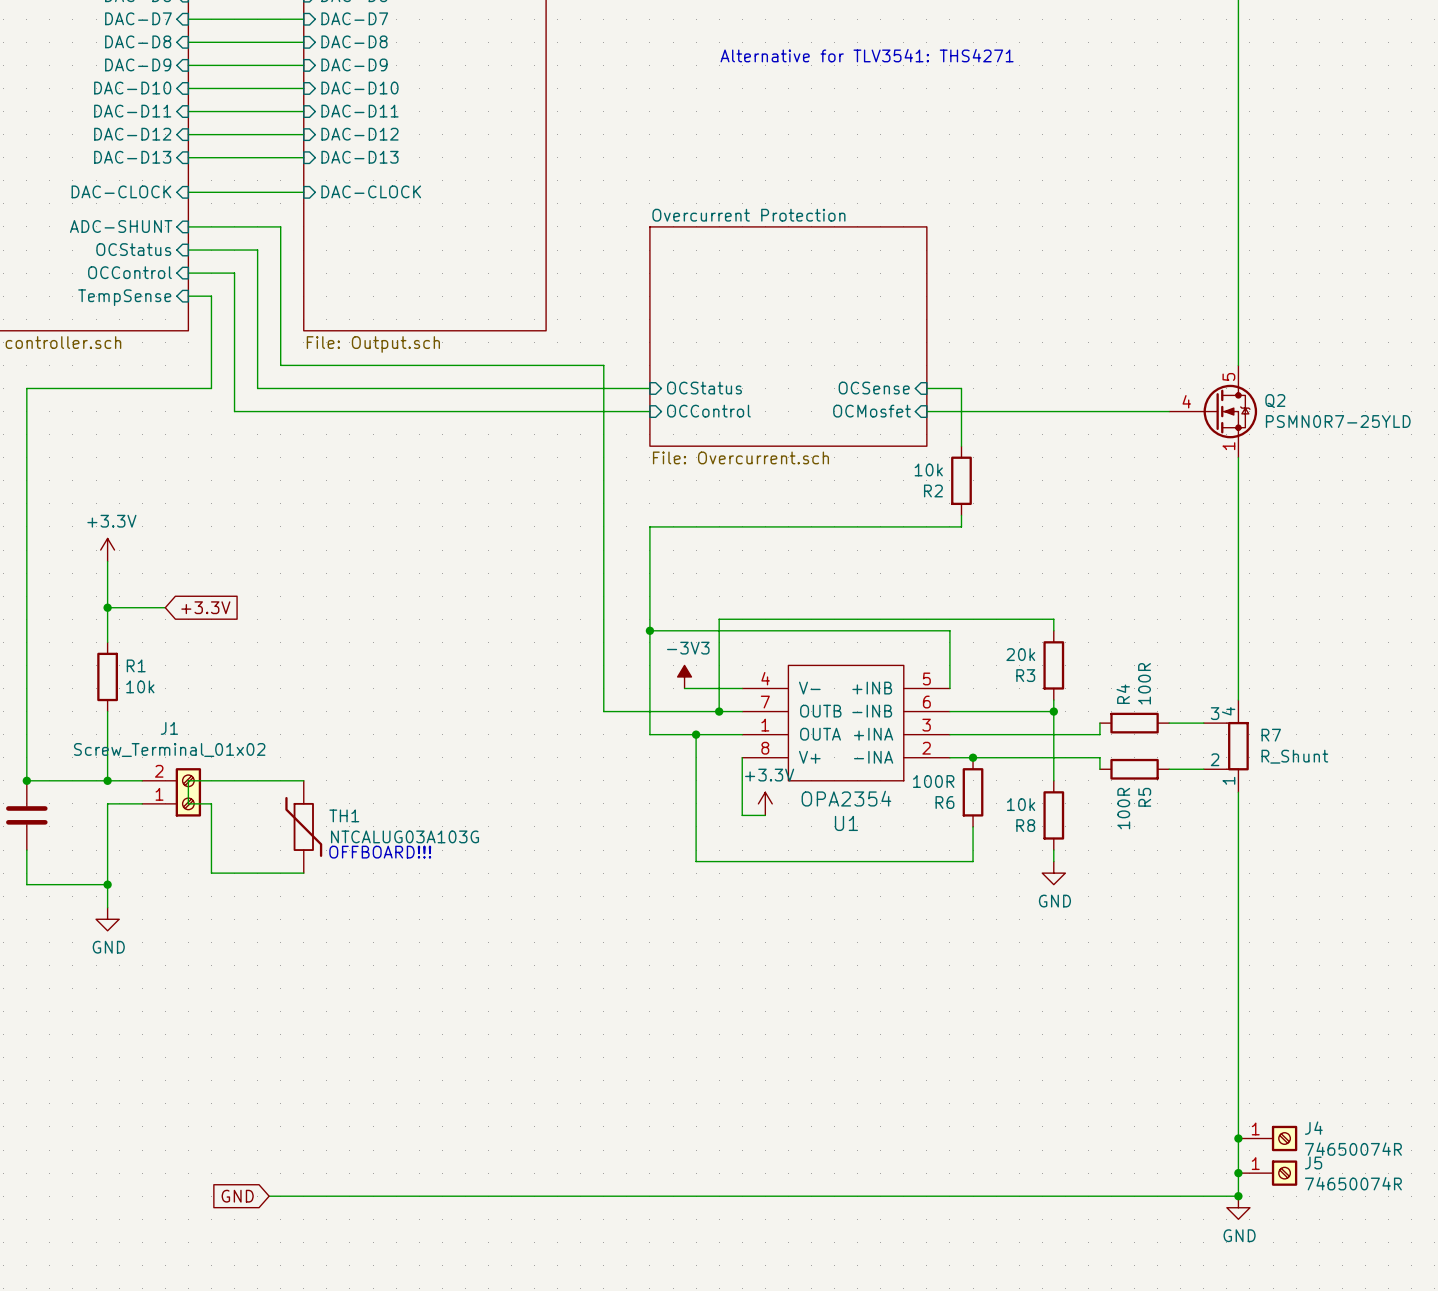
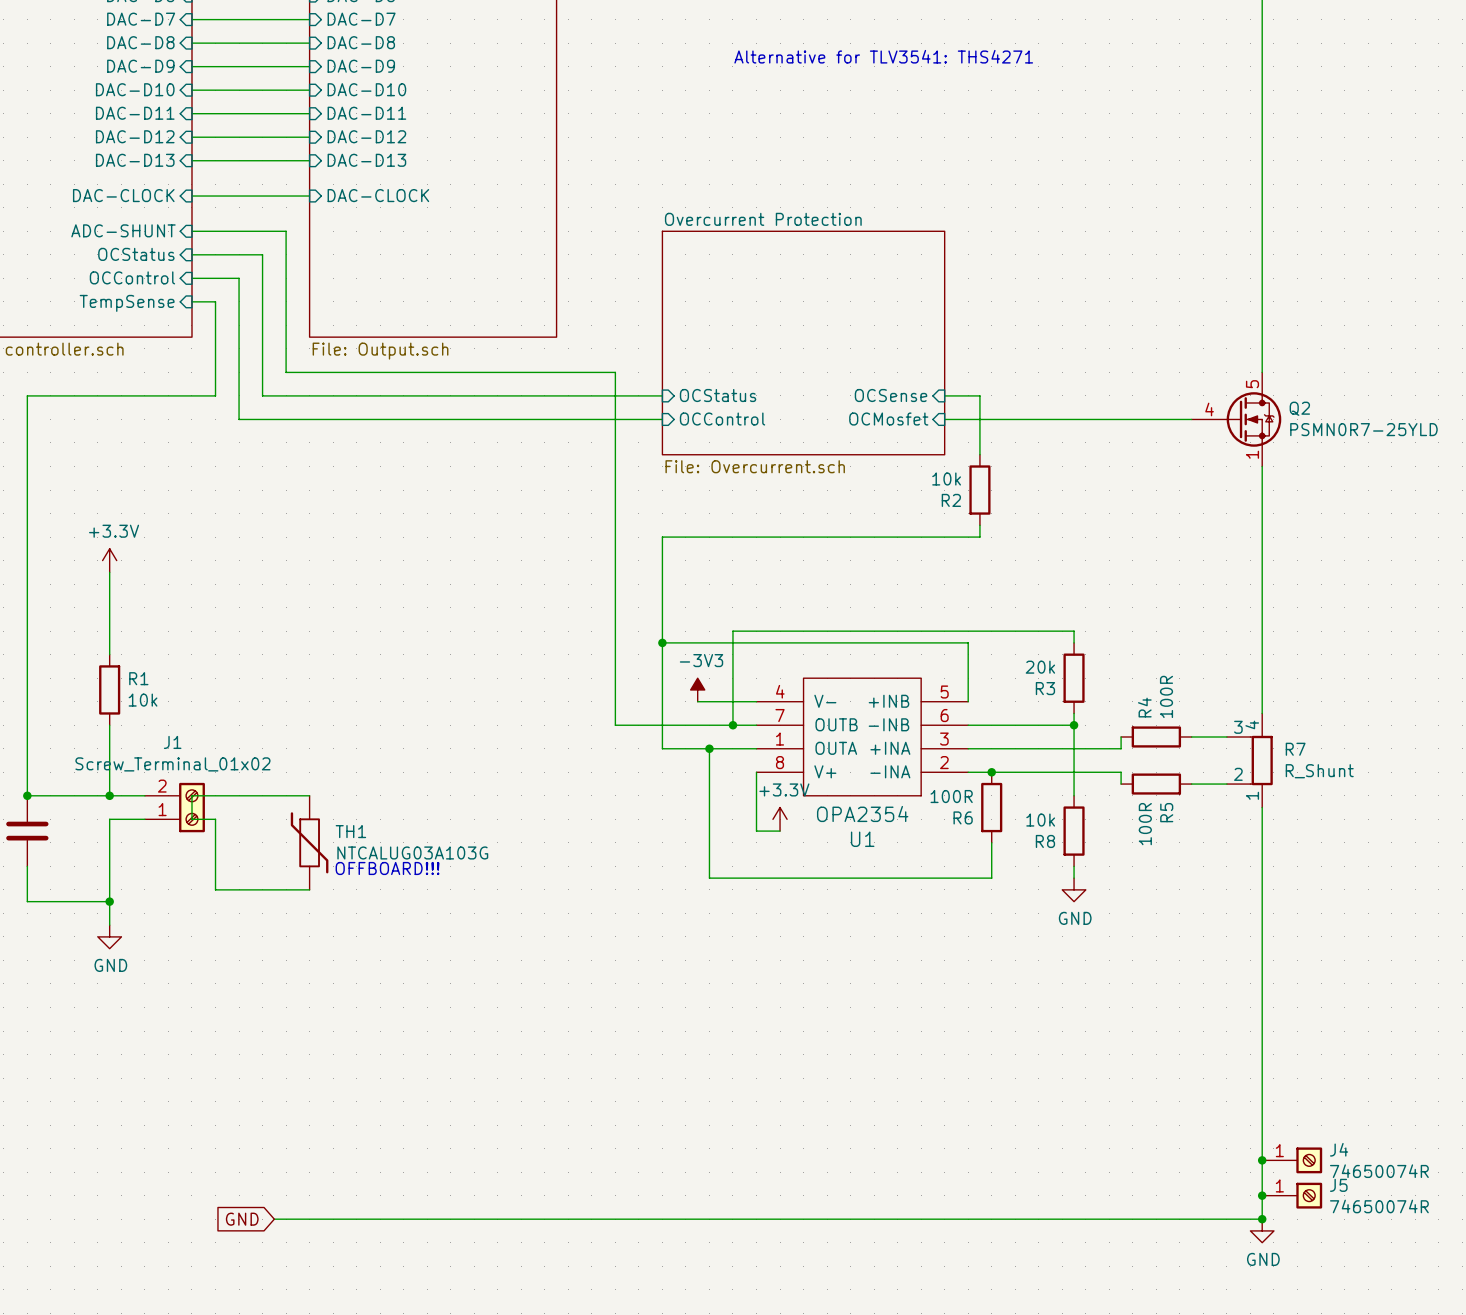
wire: (107, 607) (165, 607) -> none
junction: (107, 607) -> none
global label: +3.3V (205, 607) -> none

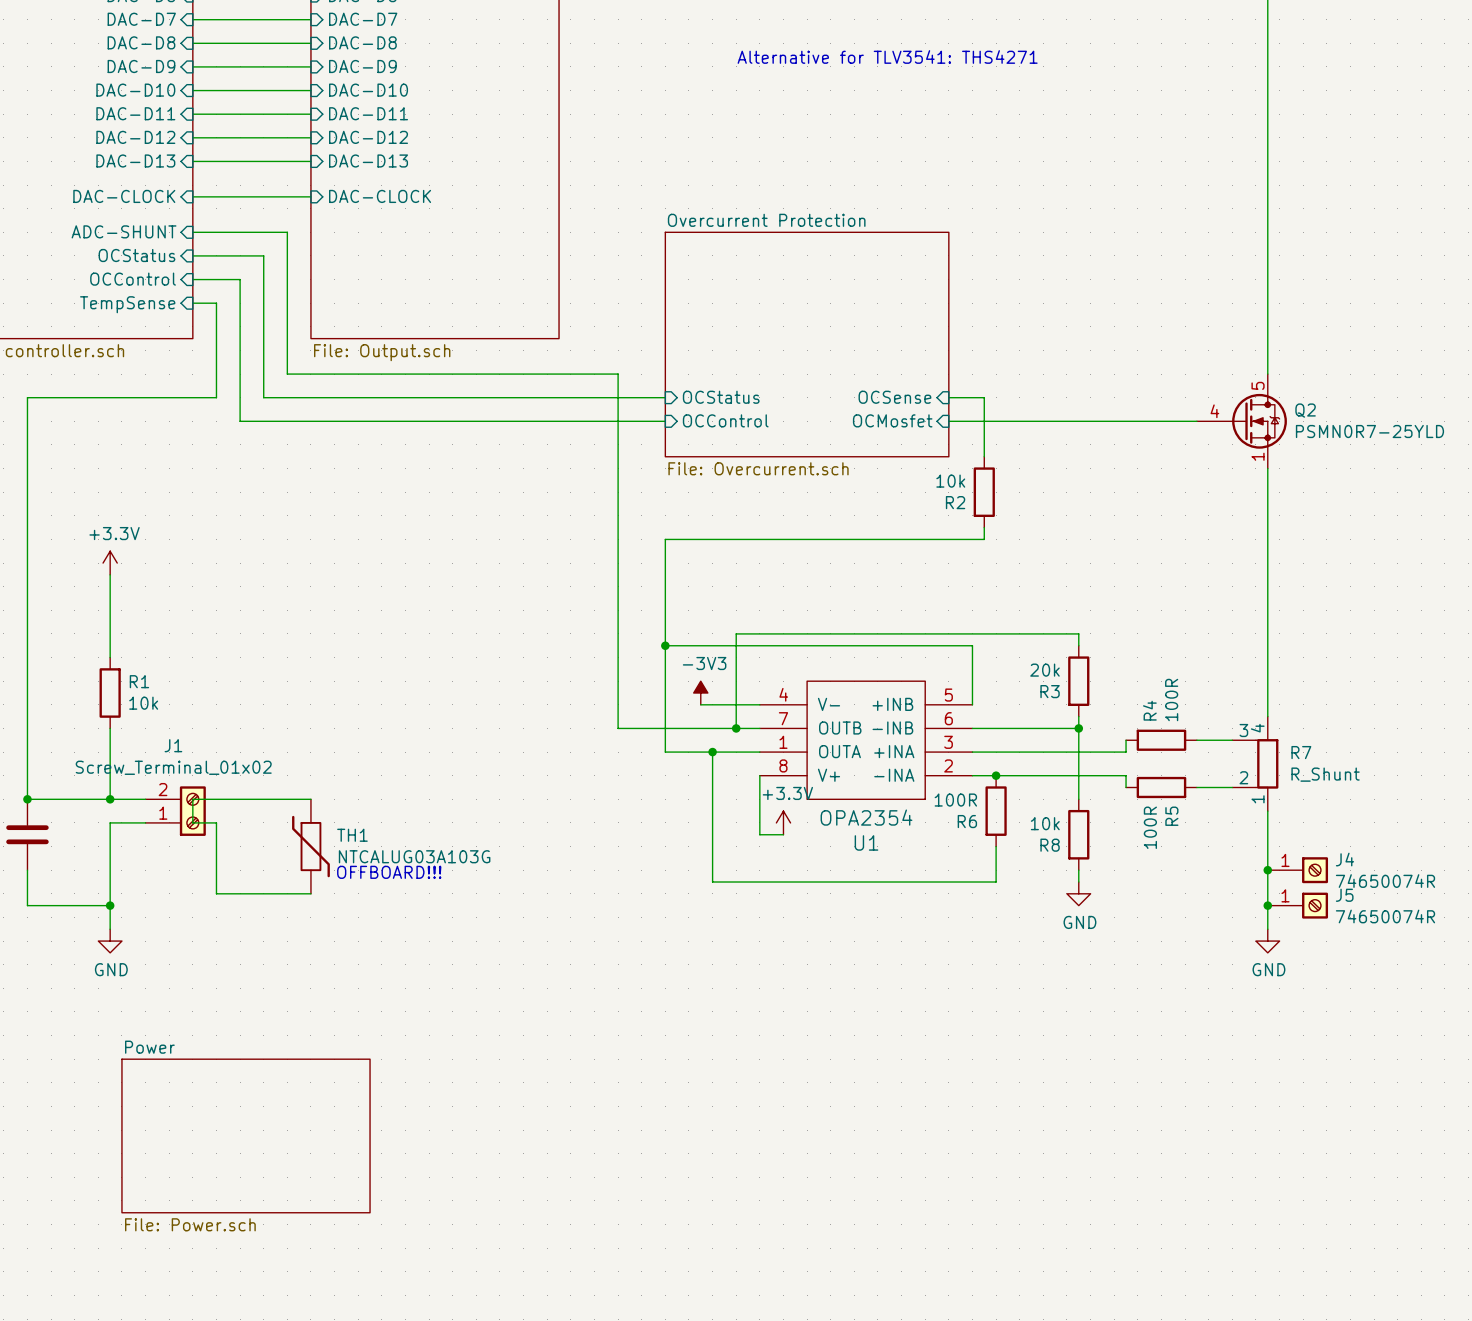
junction: none -> (1267, 870)
junction: none -> (1267, 905)
wire: (1262, 925) (1262, 1219) (274, 1219) -> none
power symbol: none -> GND (1267, 941)
sheet Power: none -> File: Power.sch (246, 1135)
junction: (1262, 1160) -> none
J4 position: (1292, 1160) -> (1297, 870)
junction: (1262, 1195) -> none
J5 position: (1292, 1195) -> (1297, 905)
global label: GND (242, 1219) -> none
junction: (1262, 1219) -> none
power symbol: GND (1262, 1230) -> none

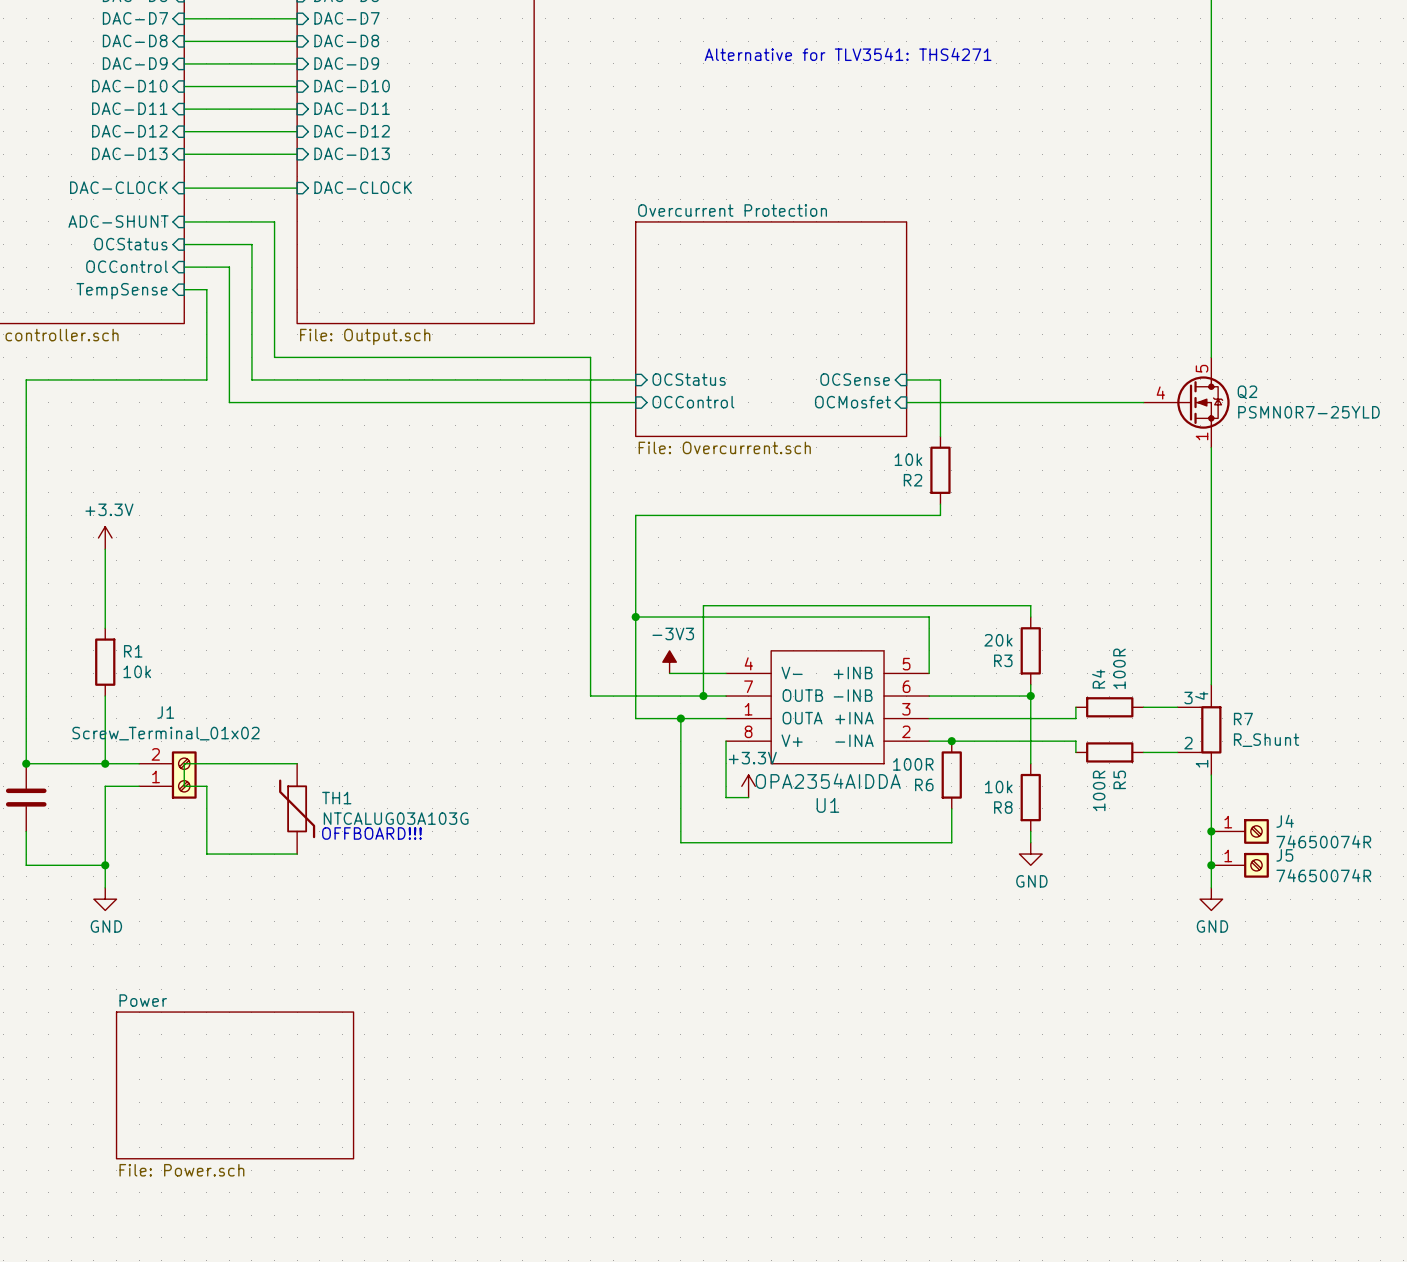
U1 value: OPA2354 (866, 817) -> OPA2354AIDDA (828, 781)

